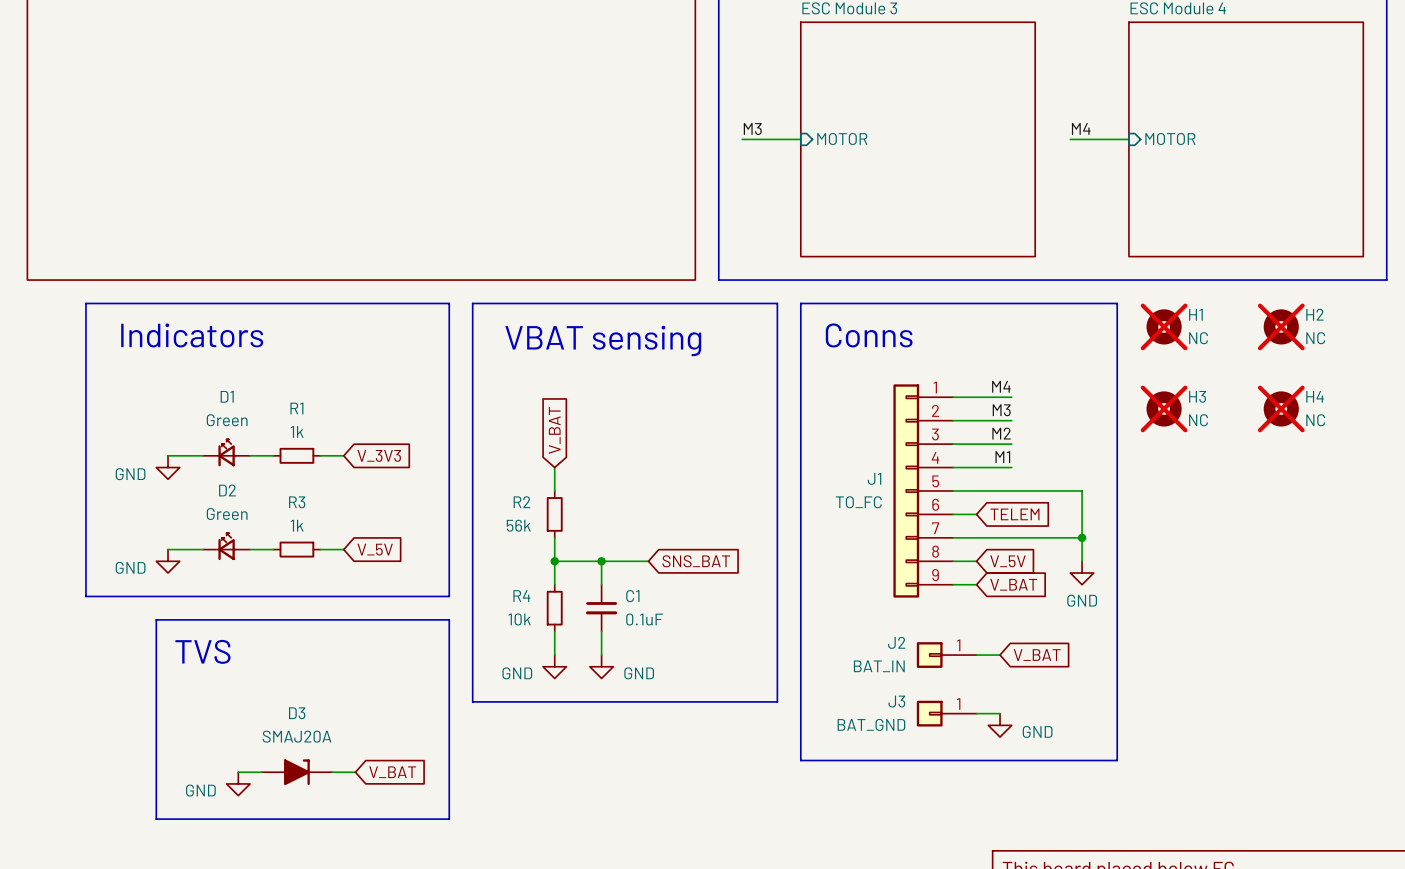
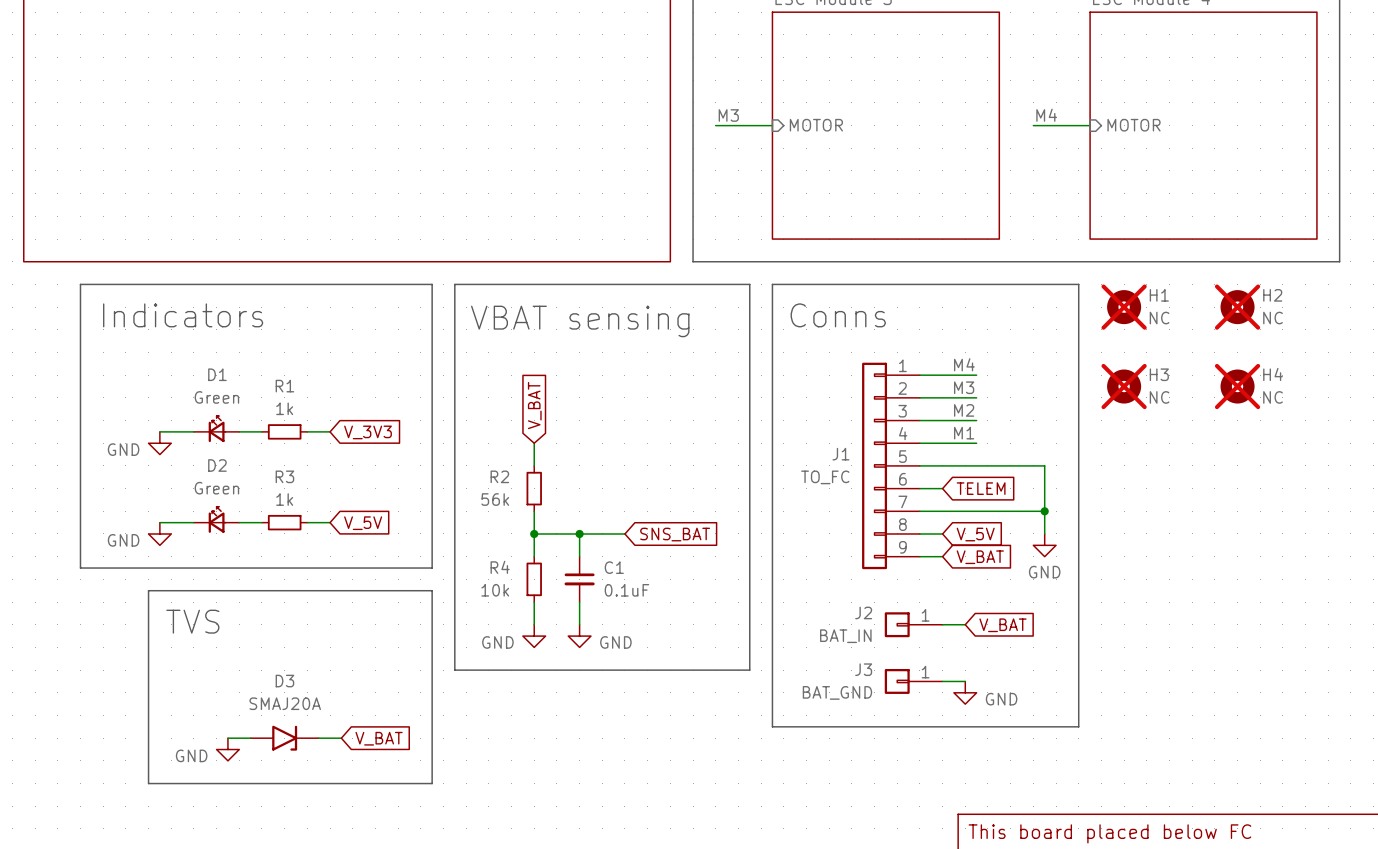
D3 symbol: [261, 759, 333, 786] -> [250, 725, 319, 751]

